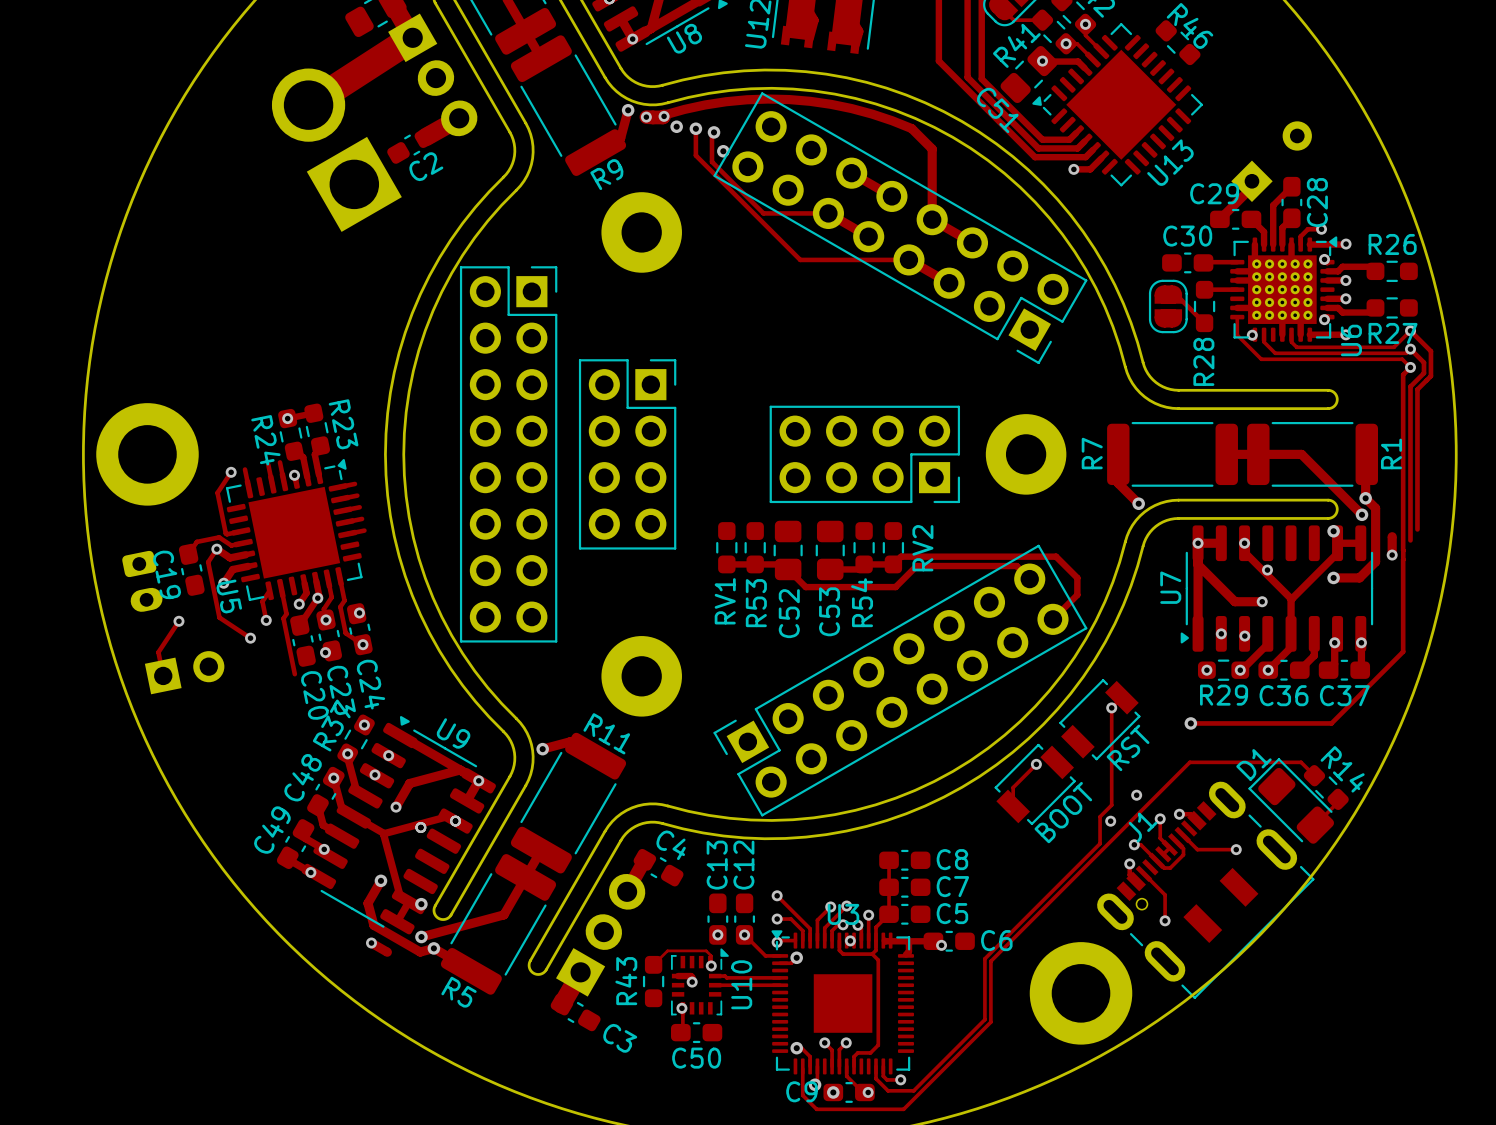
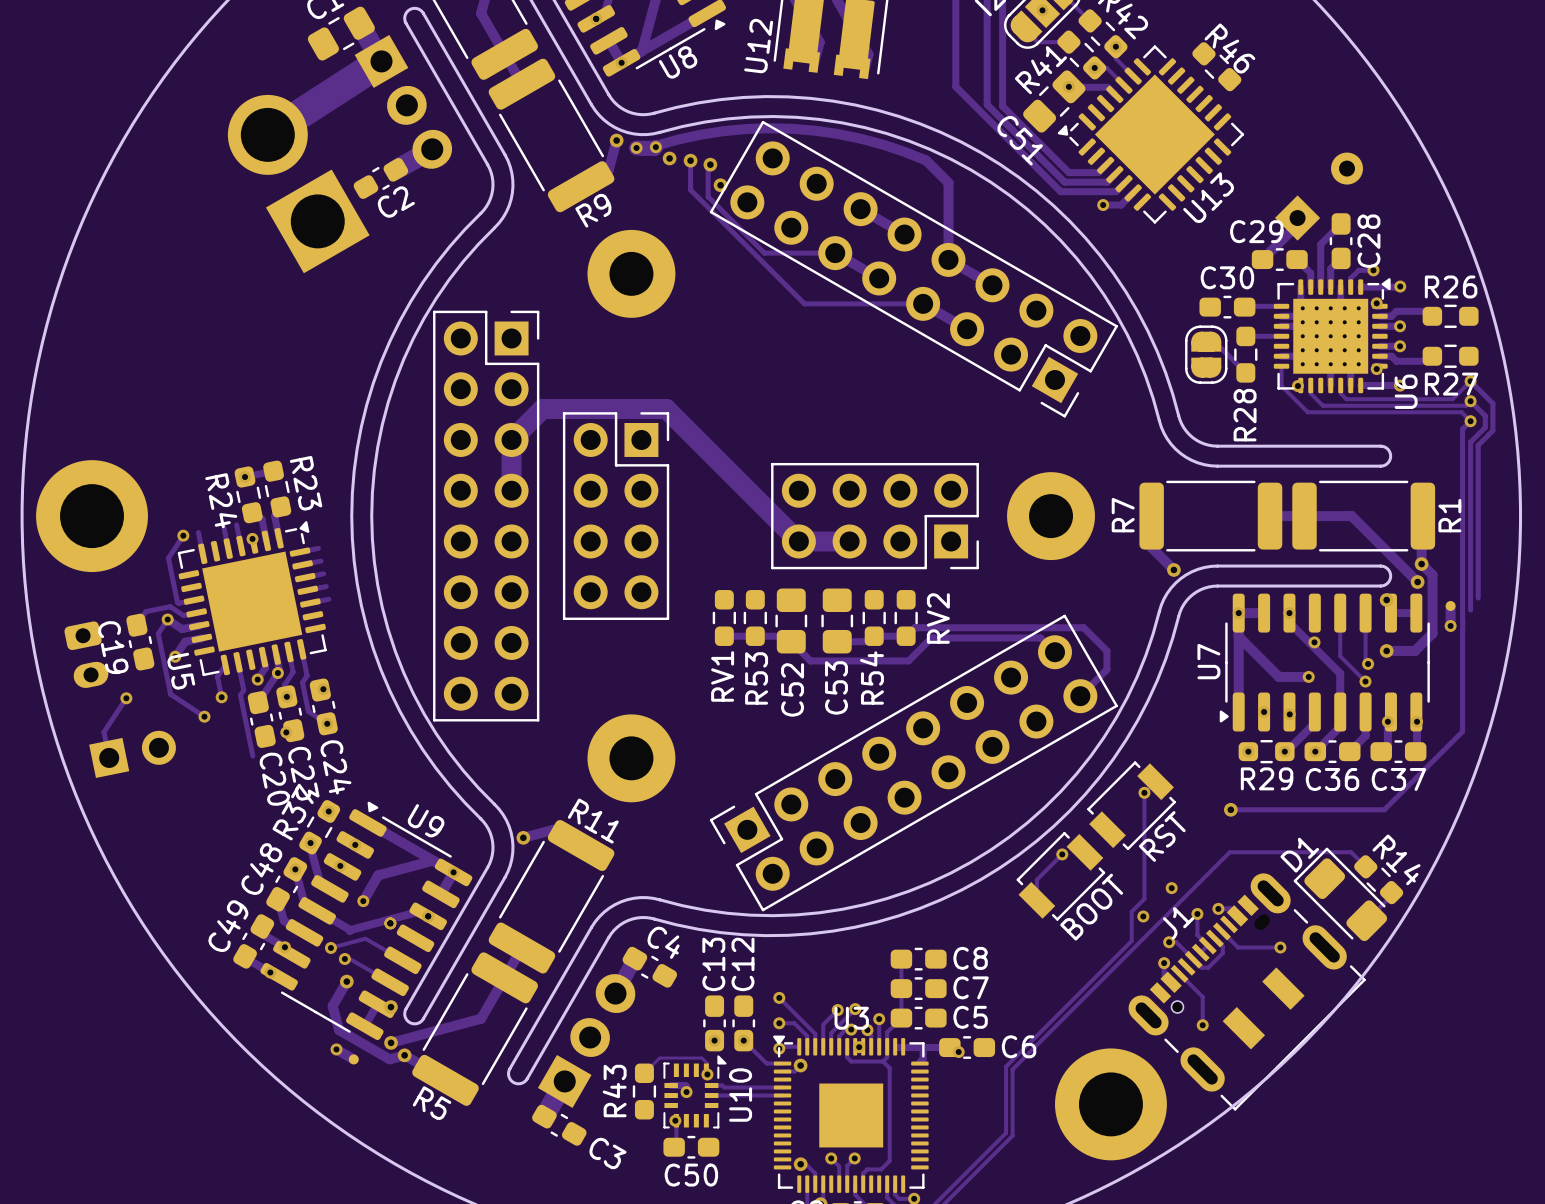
track: none -> (511, 490) (511, 439) (542, 409) (666, 409) (798, 541) (849, 541)
track: none -> (1340, 613) (1340, 656) (1365, 681)
track: none -> (1365, 613) (1365, 661) (1368, 663)
track: (1337, 543) (1337, 553) (1291, 598) -> none
via: none -> (1368, 663)
via: none -> (1365, 681)
track: (383, 834) (400, 896) (409, 901) -> none
track: none -> (330, 947) (365, 938) (402, 960)
via: none -> (330, 947)
track: none -> (344, 959) (348, 958) (390, 982)
via: none -> (344, 959)

